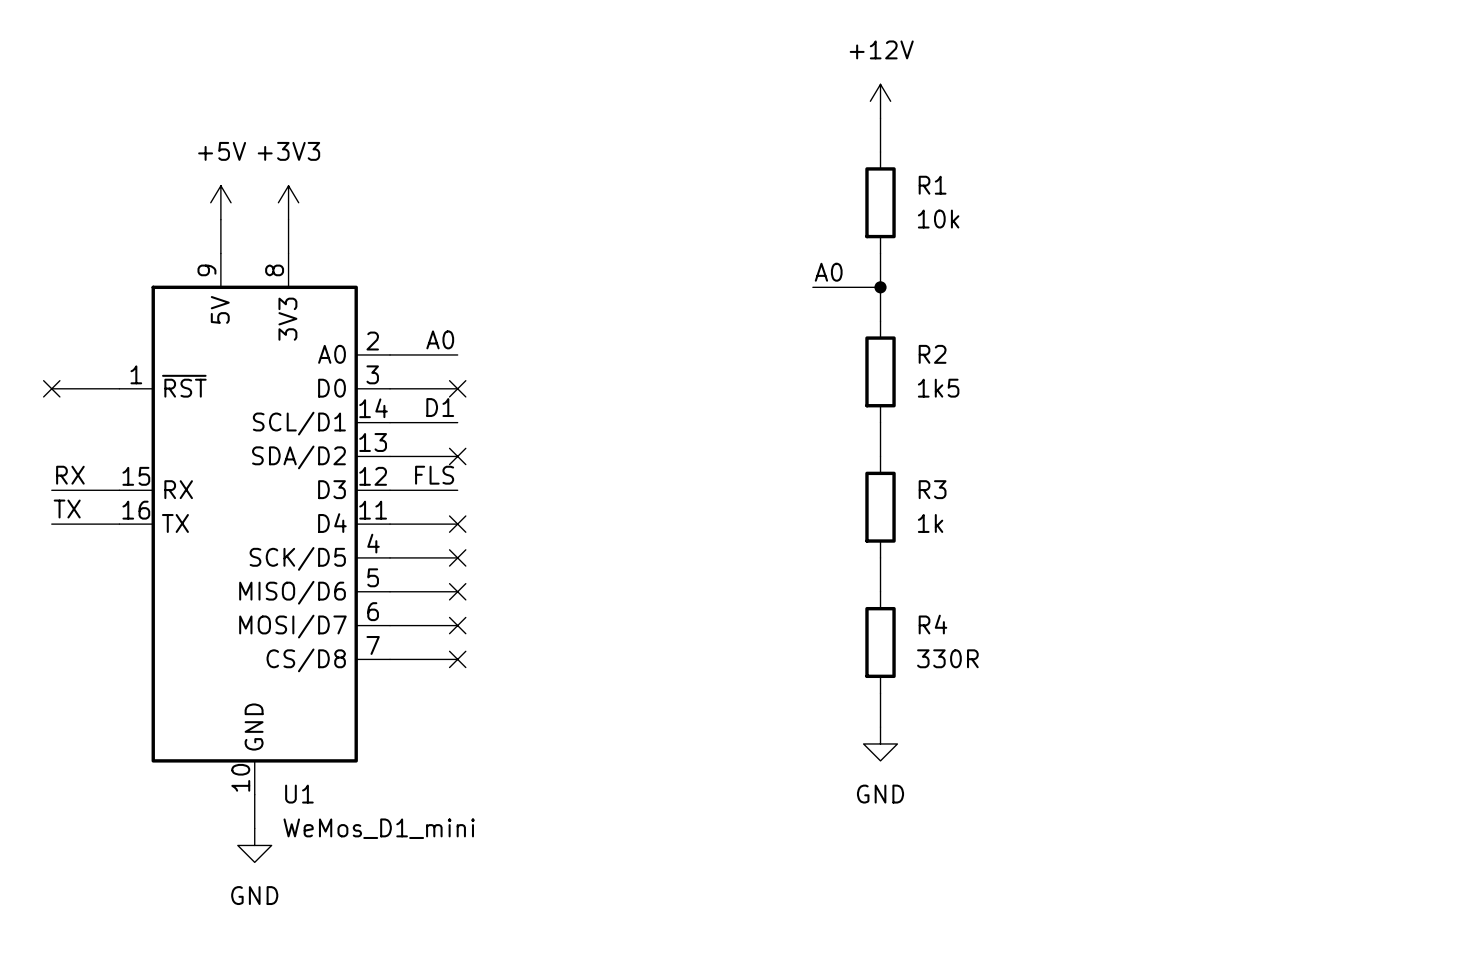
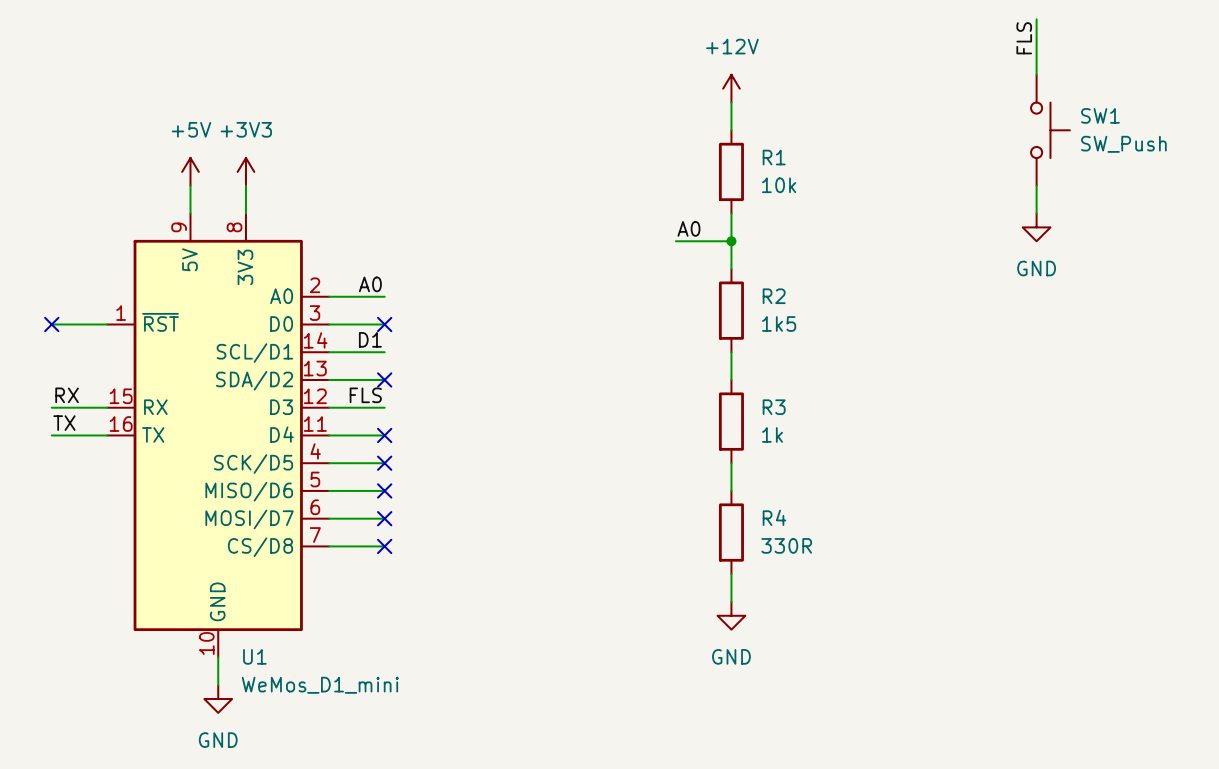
wire: none -> (1036, 19) (1036, 74)
label: none -> FLS (1024, 38)
SW1: none -> SW_Push (1050, 130)
wire: none -> (1036, 185) (1036, 213)
power symbol: none -> GND (1036, 227)

